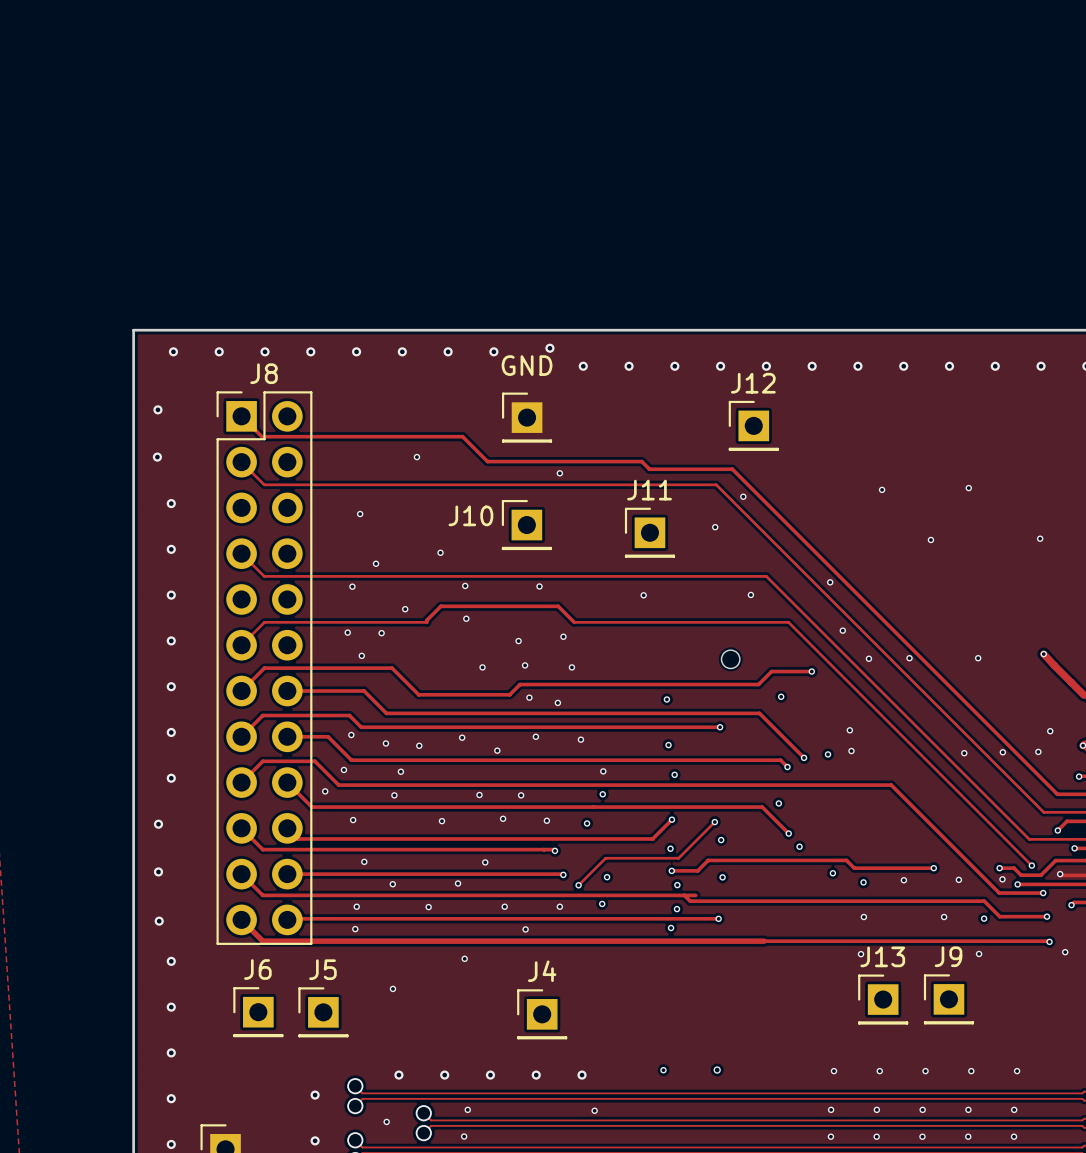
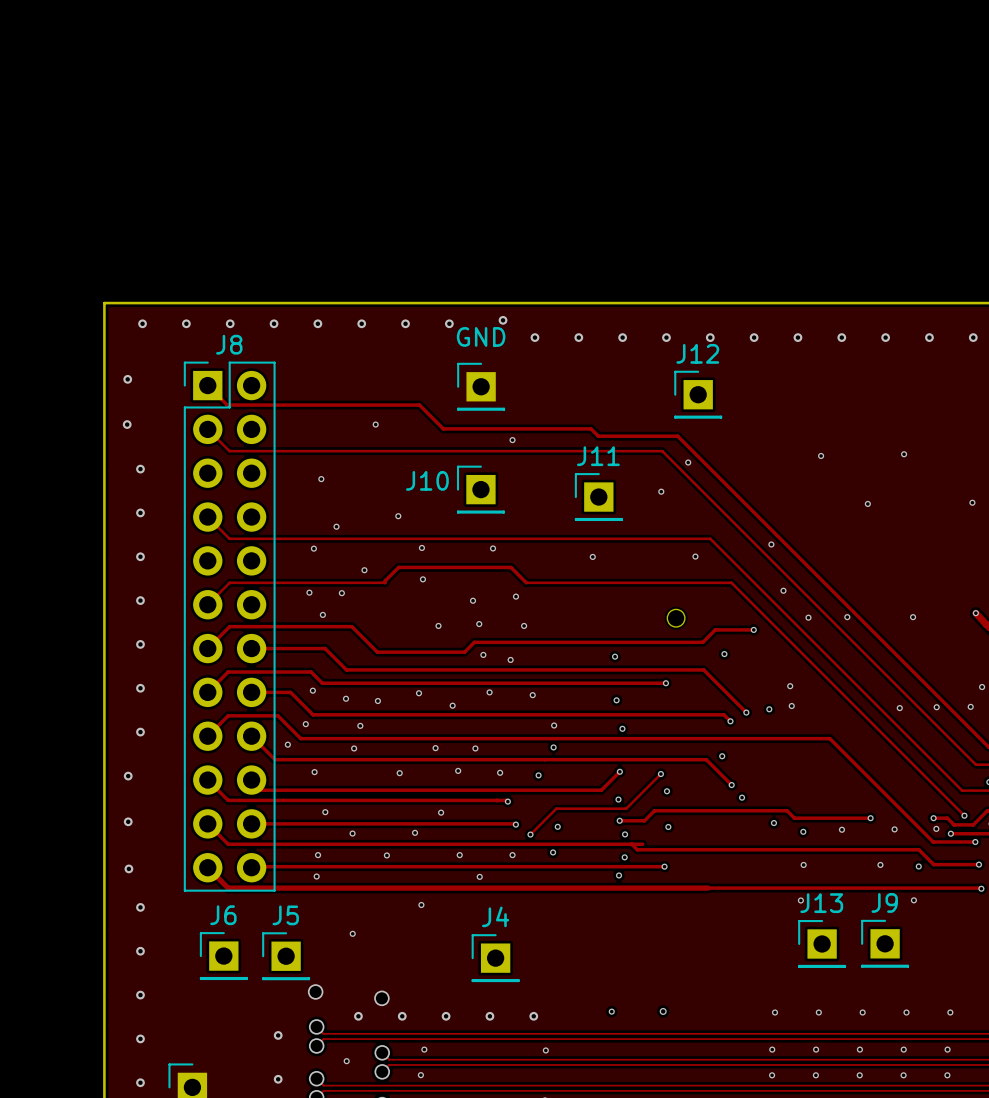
via: none -> (315, 991)
via: none -> (381, 998)

